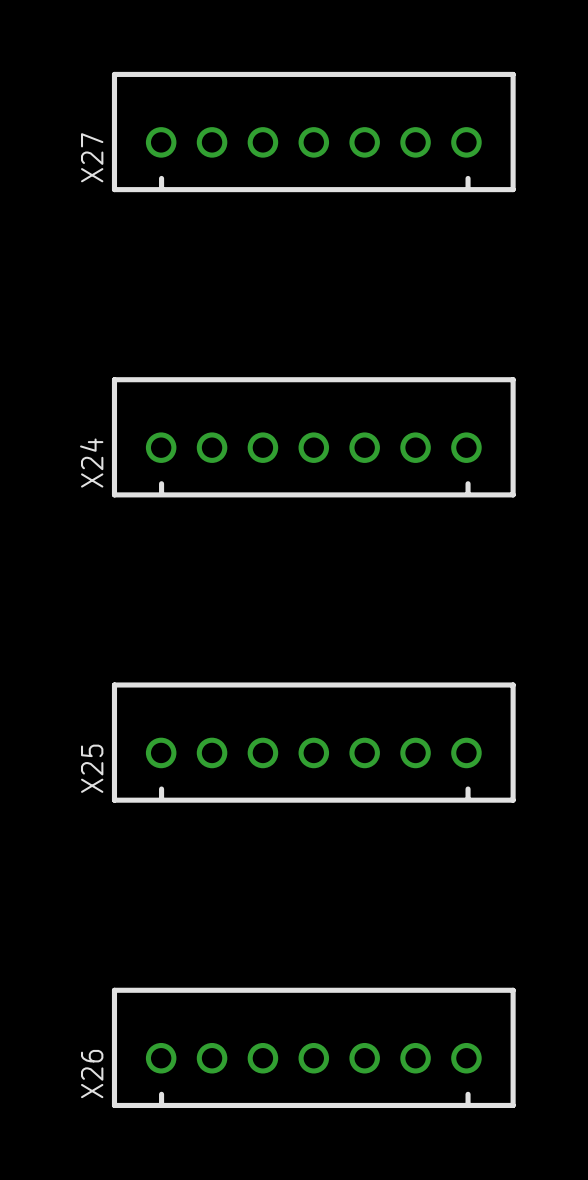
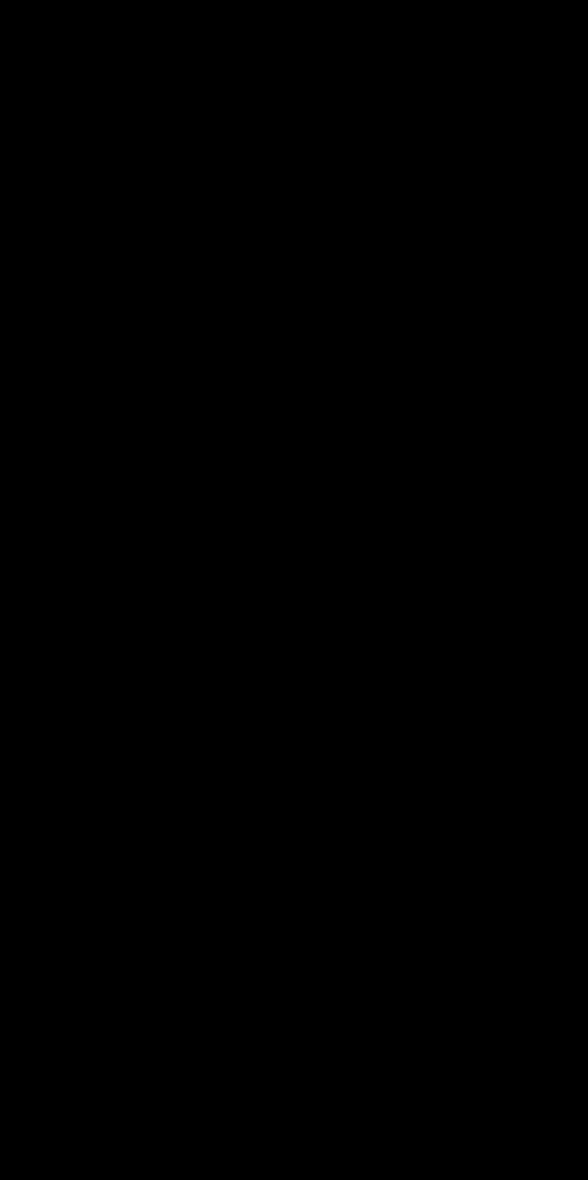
X27: (313, 132) -> none
X24: (313, 437) -> none
X25: (313, 742) -> none
X26: (313, 1047) -> none

